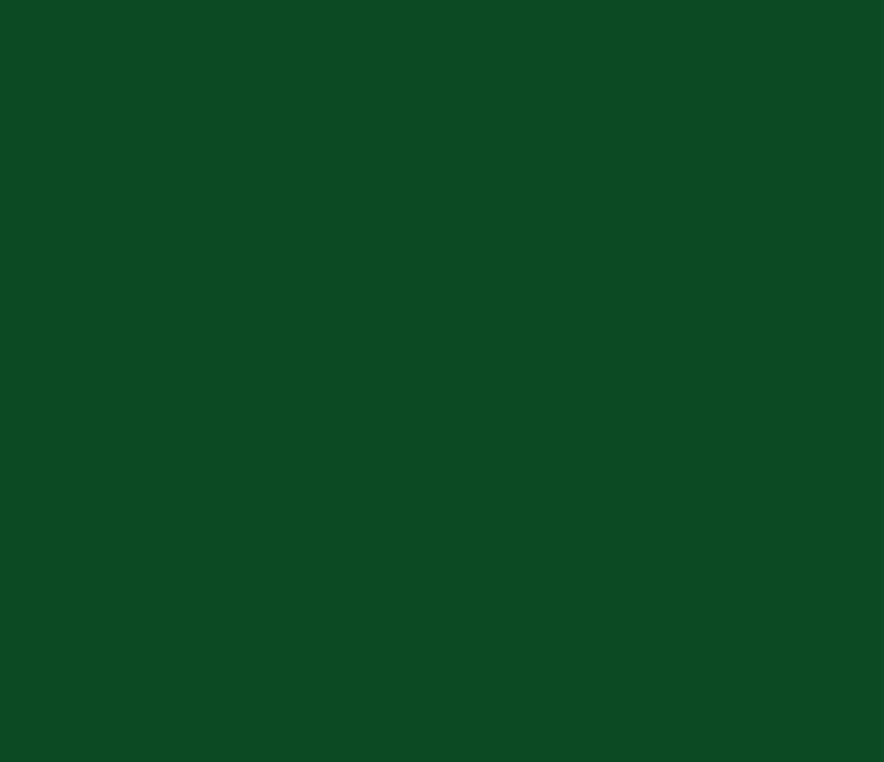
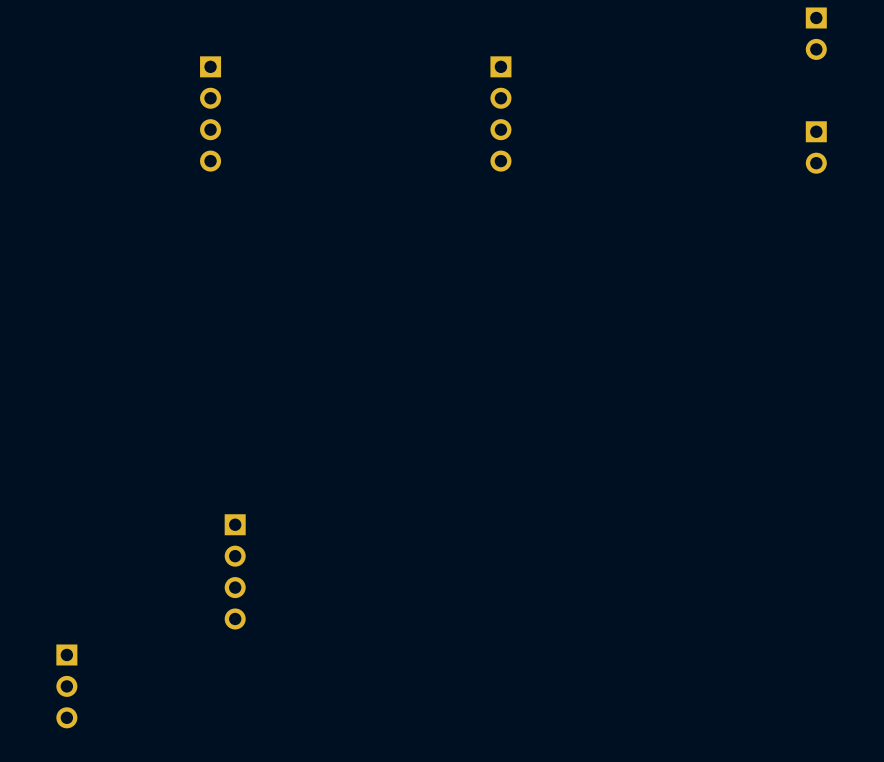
part: none -> (816, 33)
part: none -> (210, 113)
part: none -> (500, 113)
part: none -> (816, 147)
part: none -> (235, 571)
part: none -> (66, 686)

